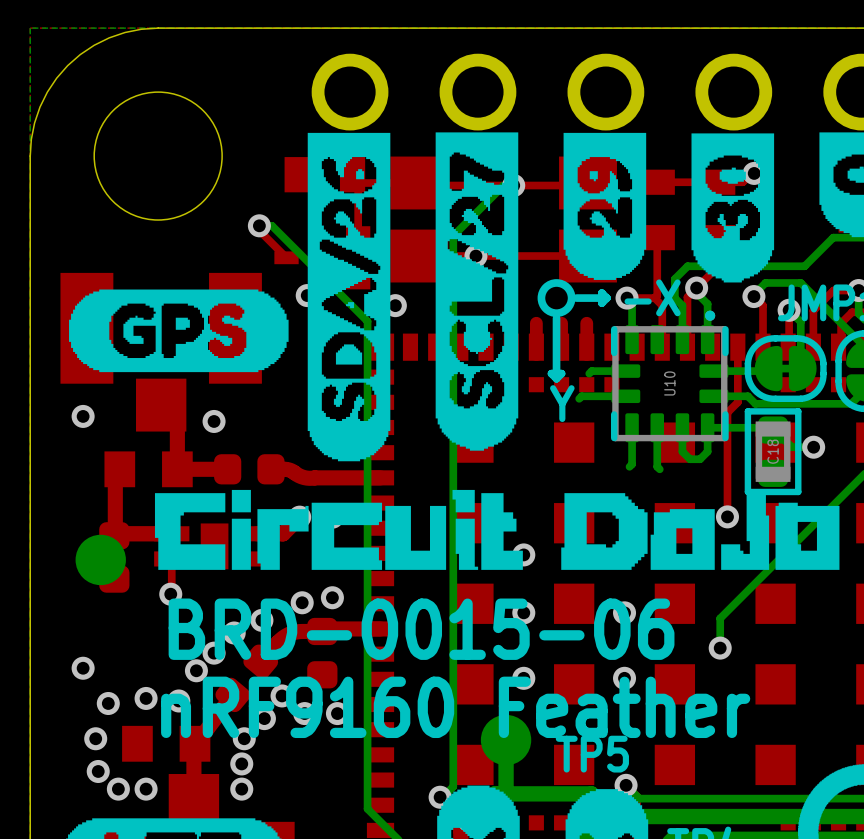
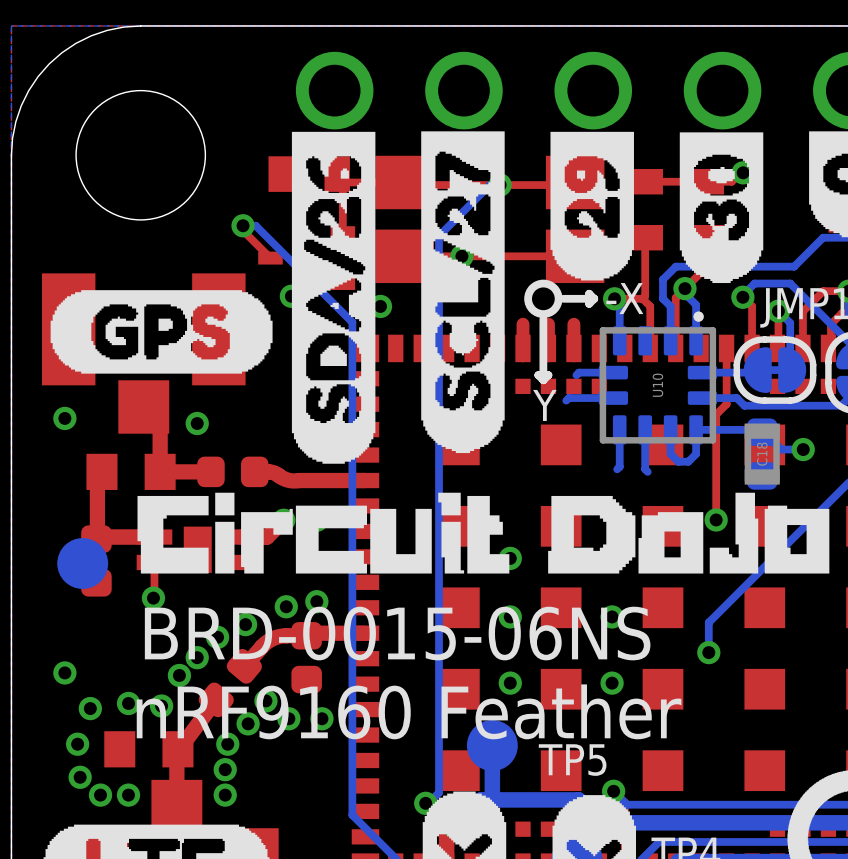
U10 footprint: [610, 310, 729, 443] -> [598, 311, 718, 445]
C18 footprint: [744, 408, 802, 496] -> [744, 418, 780, 490]
text: BRD-0015-06 (421, 629) -> BRD-0015-06NS (397, 633)

